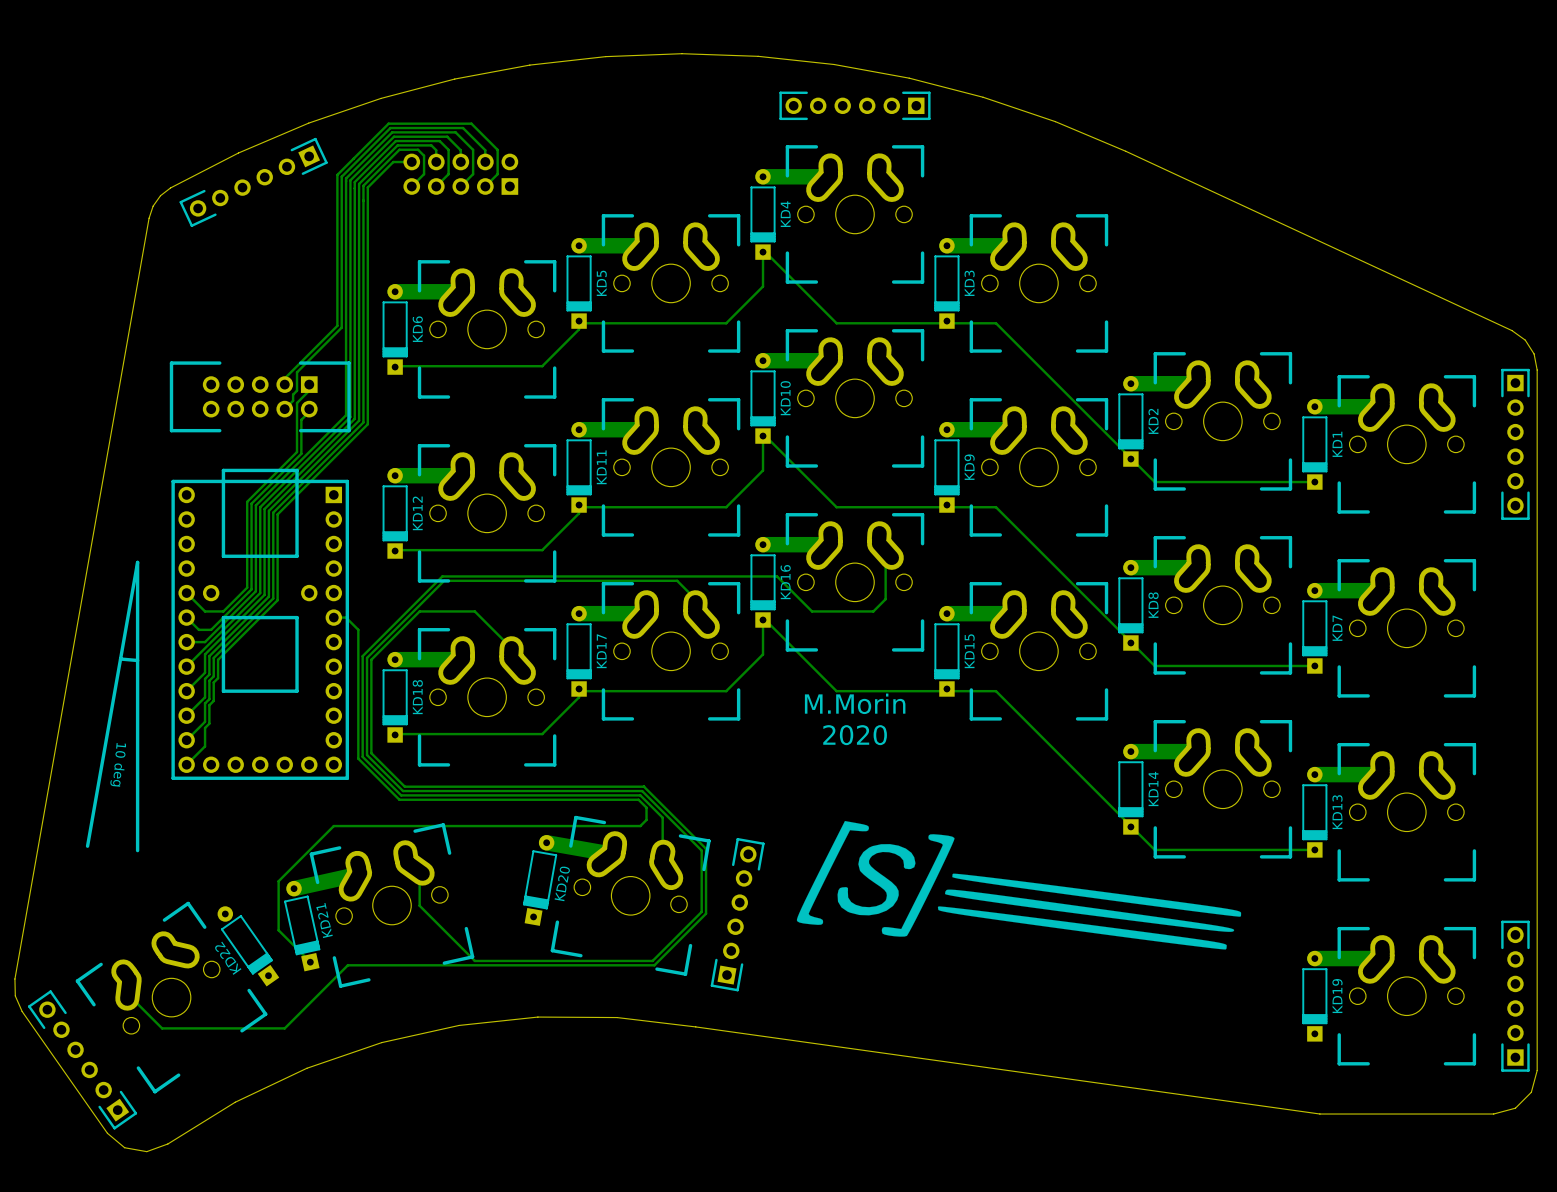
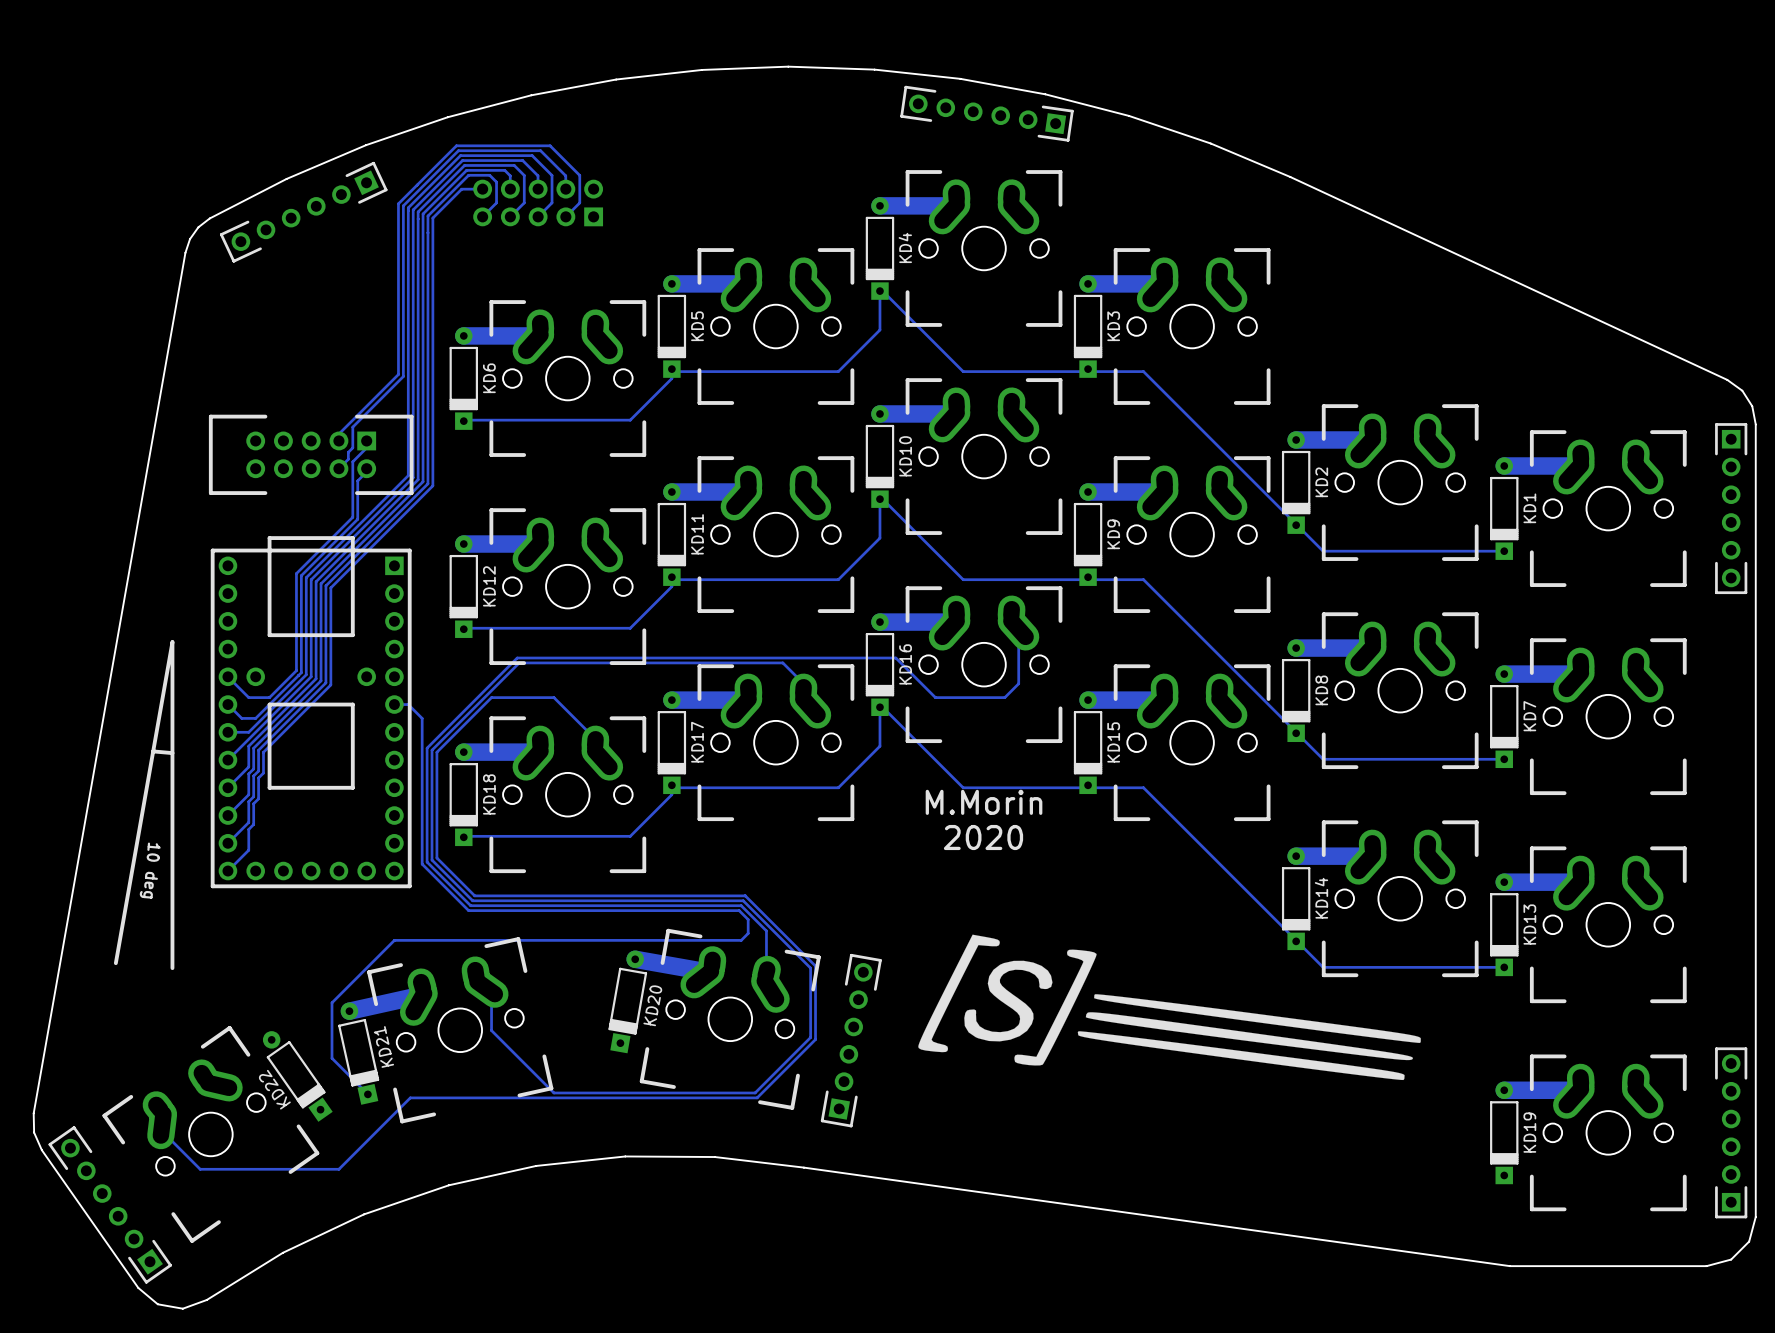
part: none -> (986, 113)
part: (854, 105) -> none

